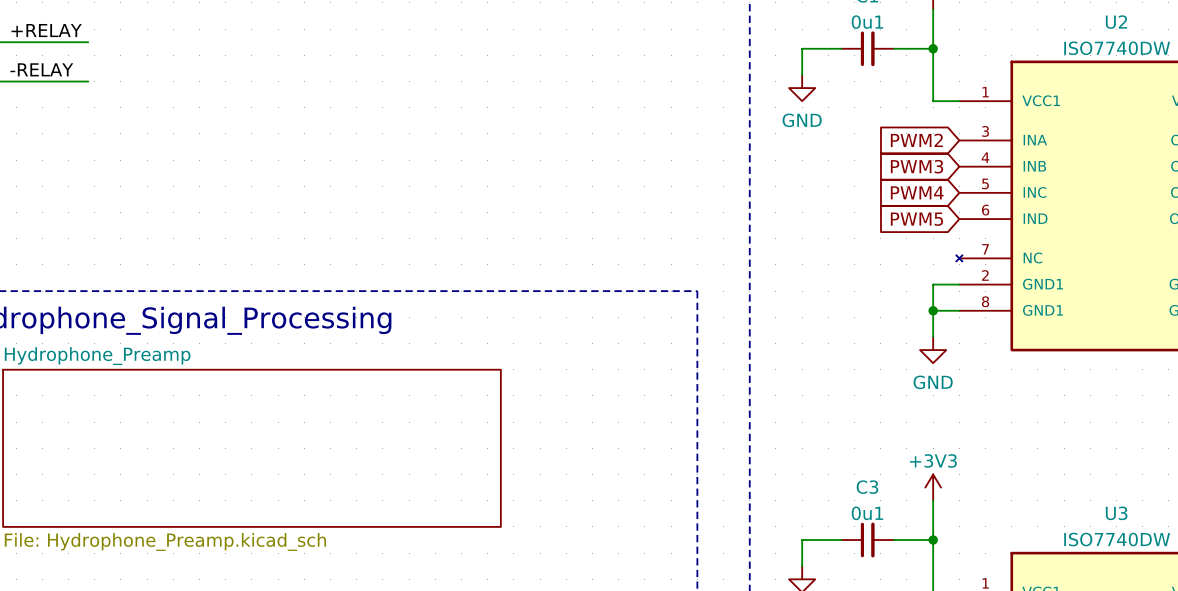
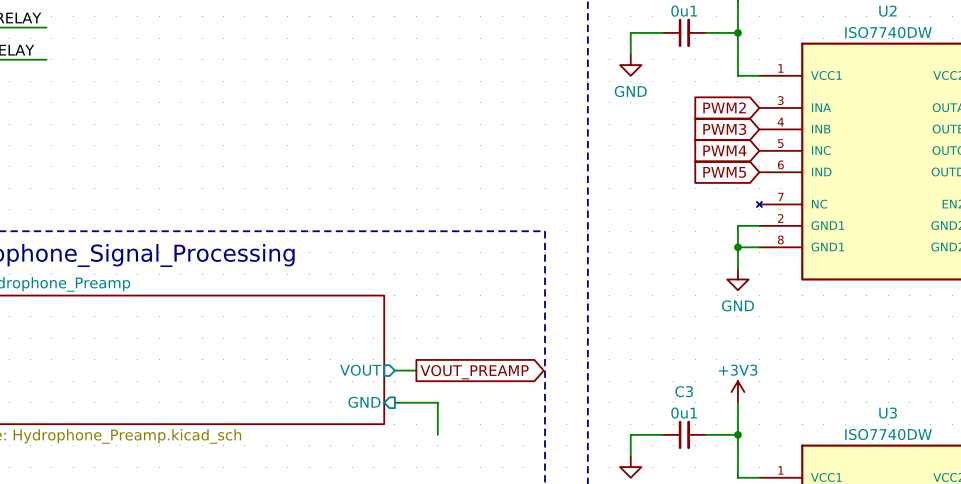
sheet pin: none -> VOUT (360, 370)
wire: none -> (394, 370) (416, 370)
global label: none -> VOUT_PREAMP (474, 372)
sheet pin: none -> GND (364, 402)
wire: none -> (394, 402) (437, 402) (437, 434)

